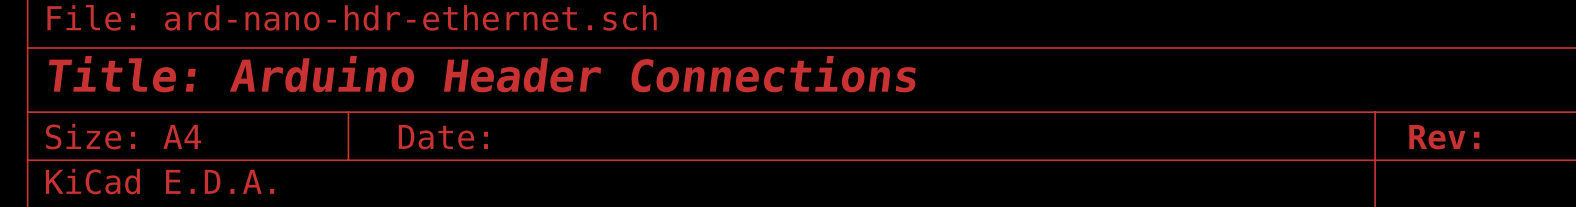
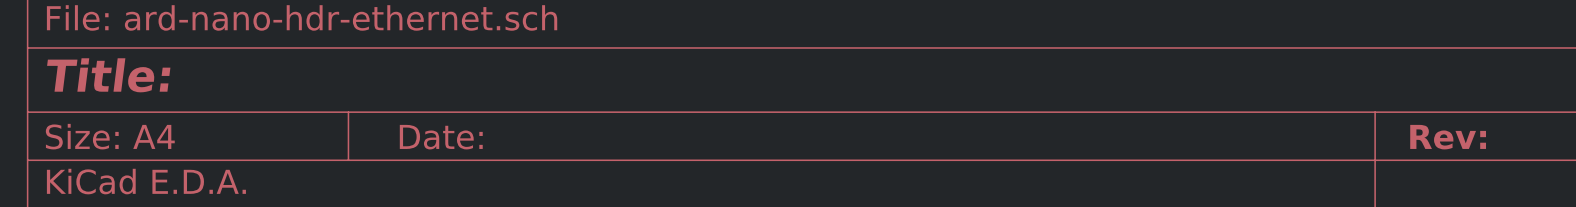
title block: Title: Arduino Header Connections (482, 74) -> Title: (108, 75)

